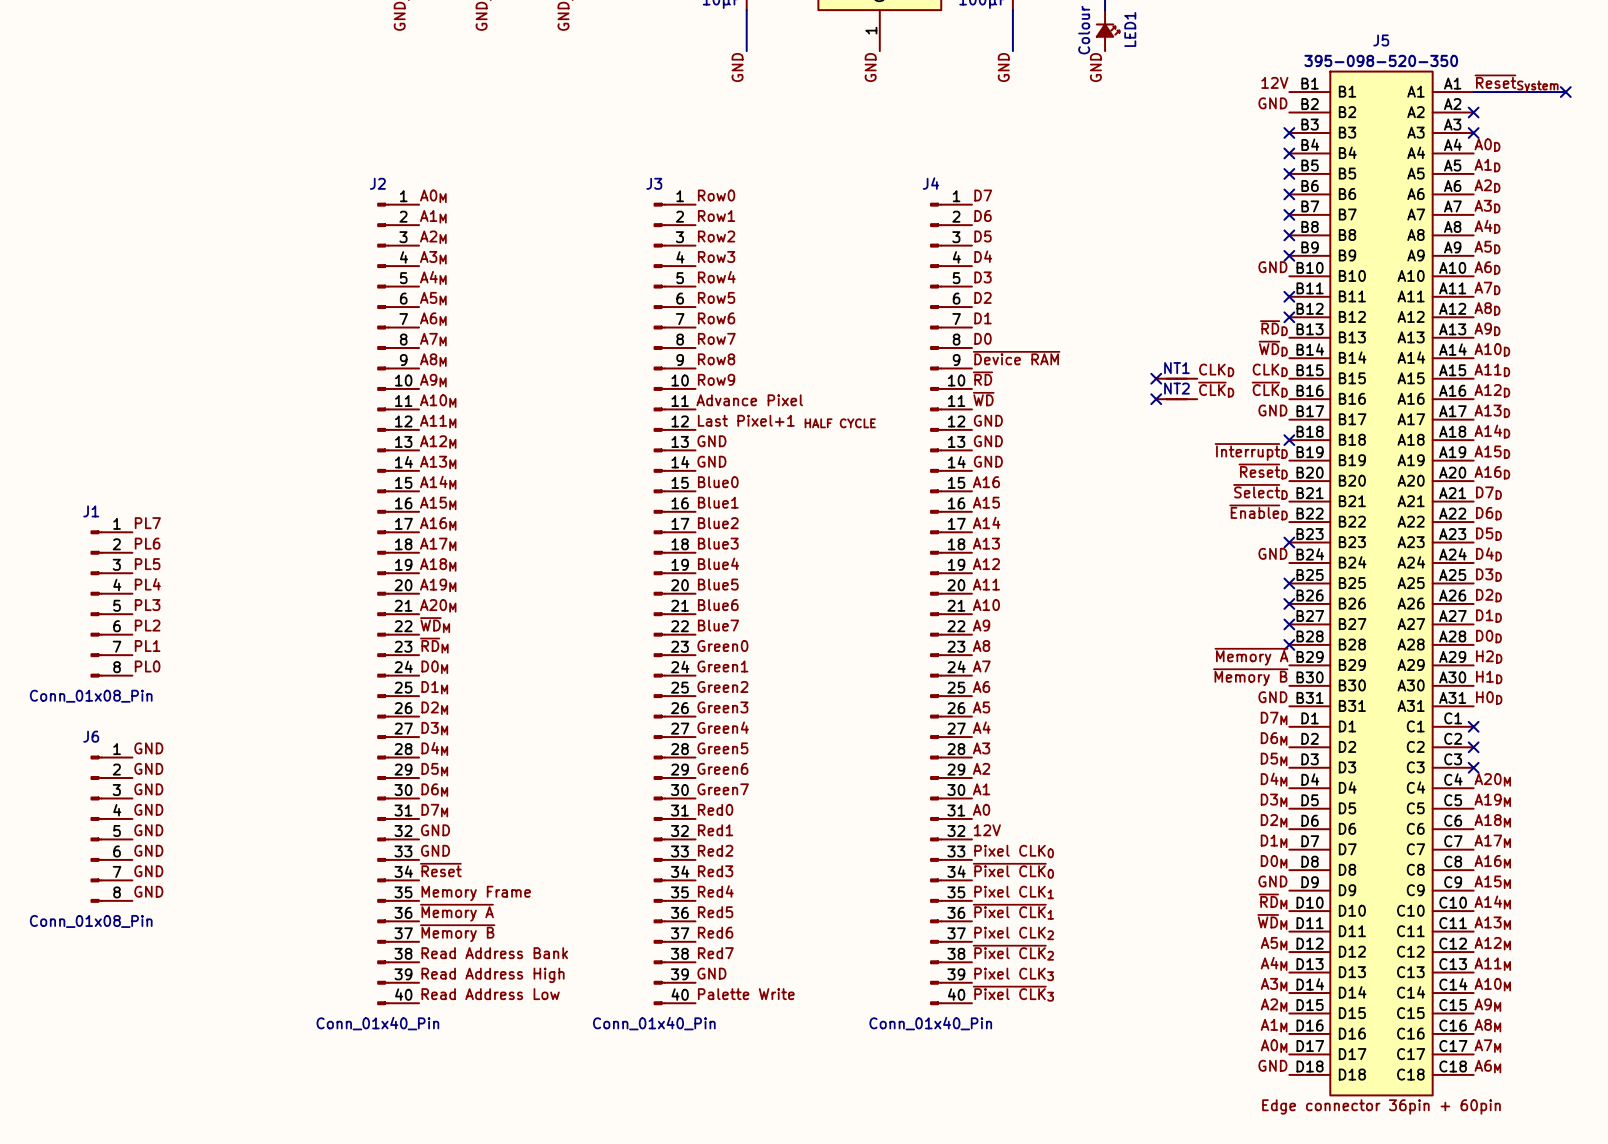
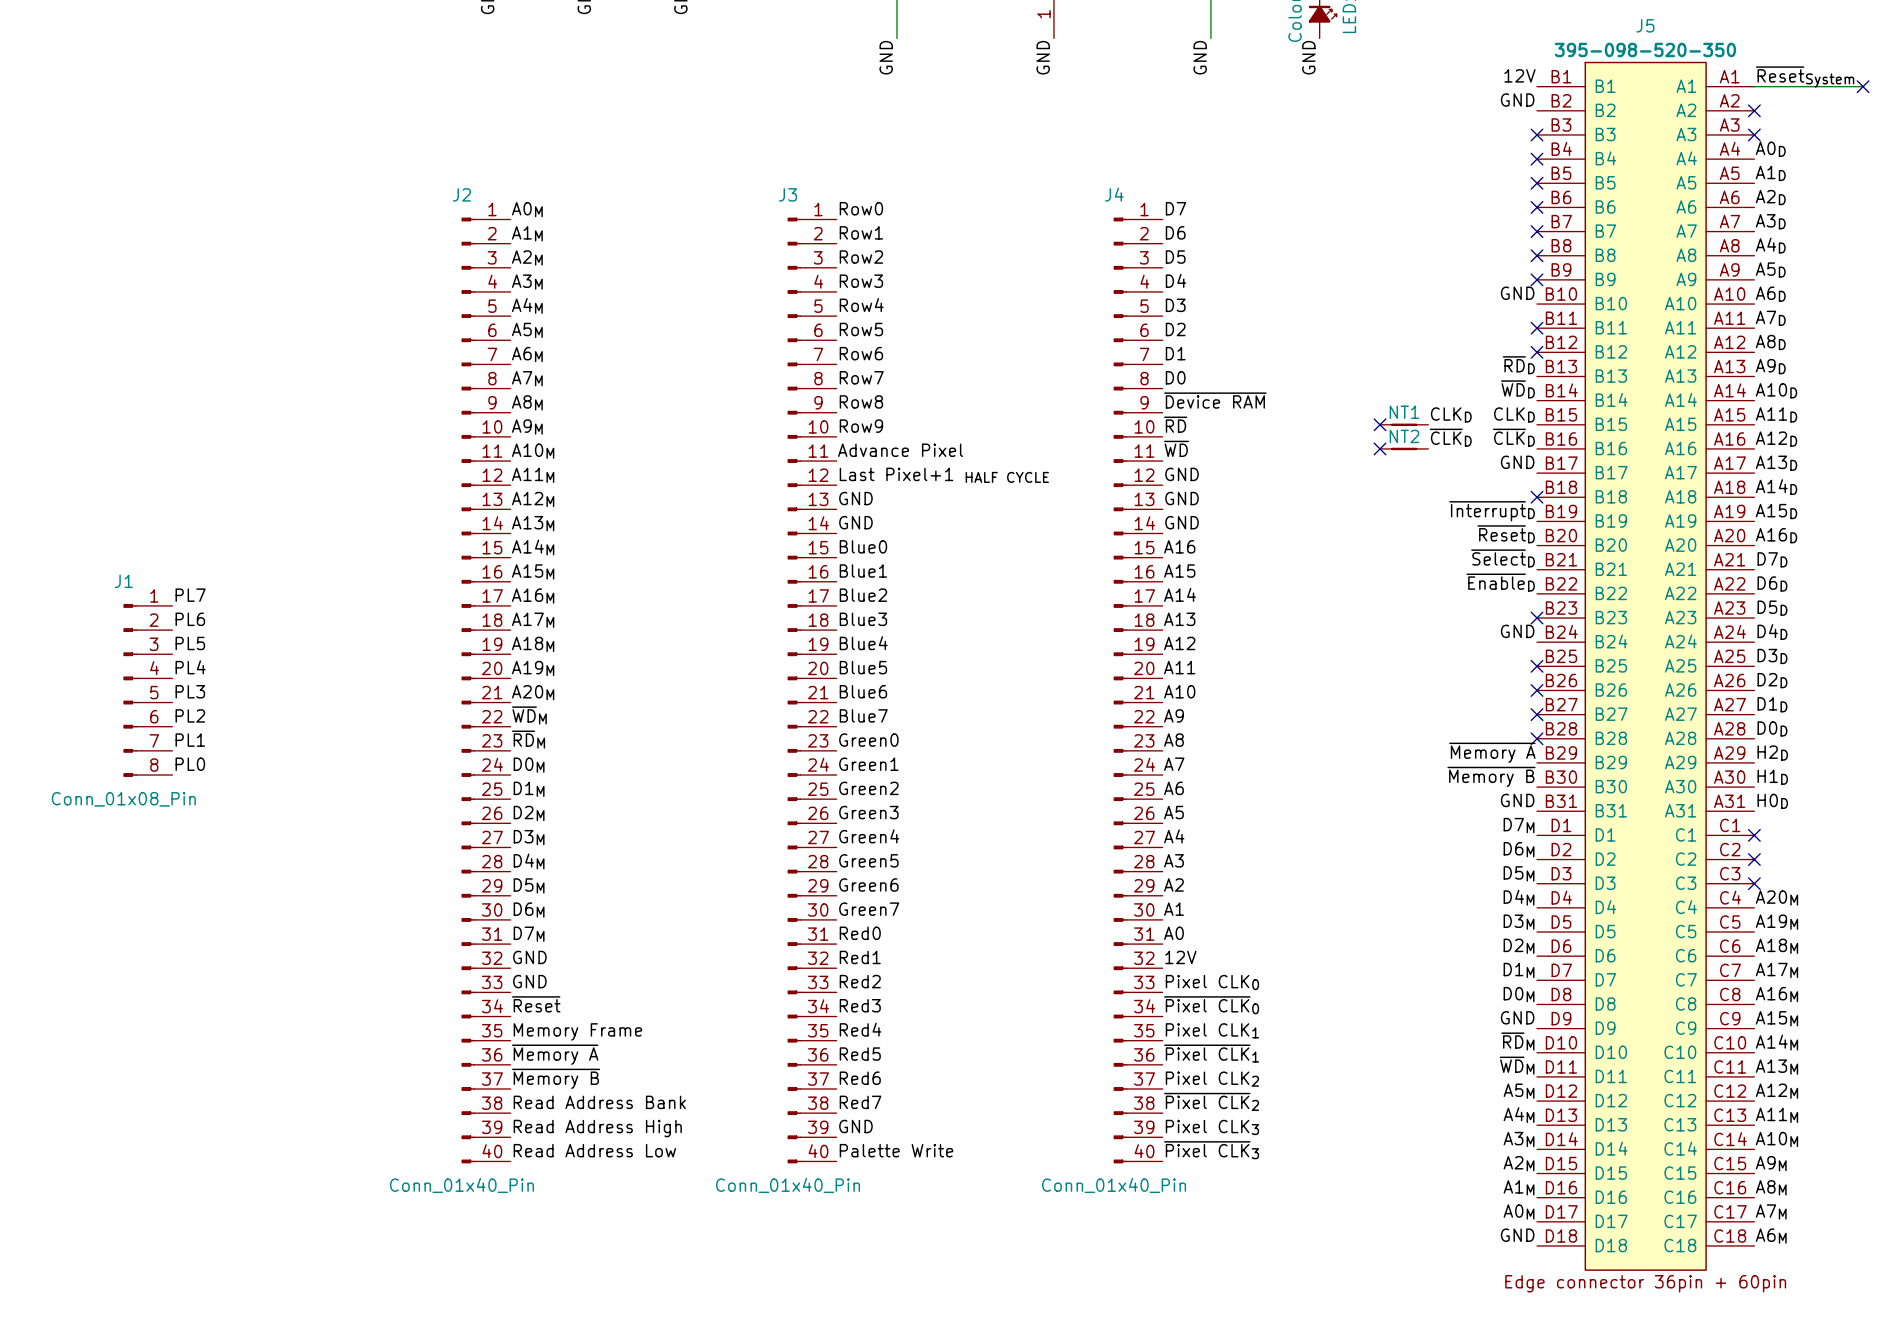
label: GND (148, 748) -> none
label: GND (148, 768) -> none
label: GND (148, 789) -> none
label: GND (148, 809) -> none
J6: Conn_01x08_Pin (111, 829) -> none
label: GND (148, 830) -> none
label: GND (148, 850) -> none
label: GND (148, 871) -> none
label: GND (148, 891) -> none

